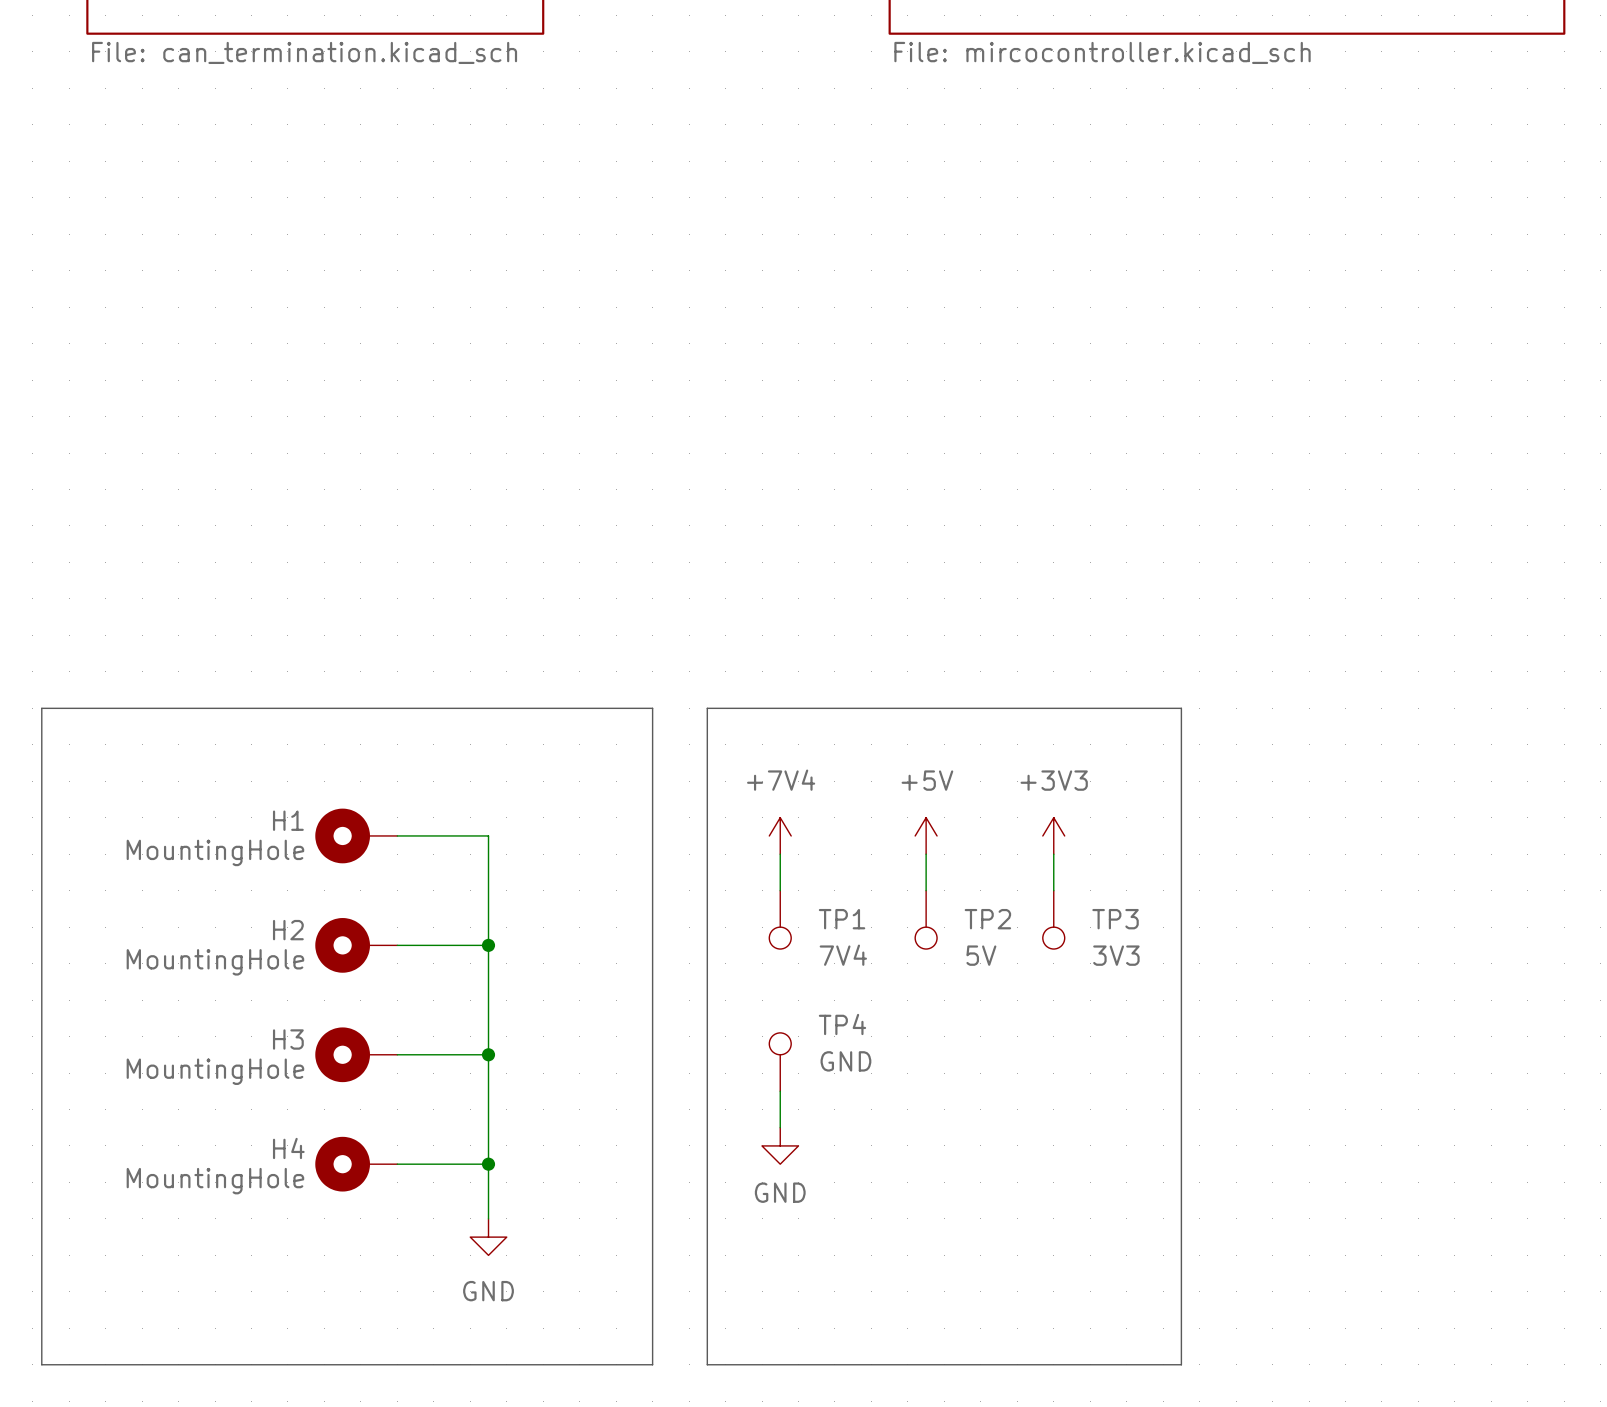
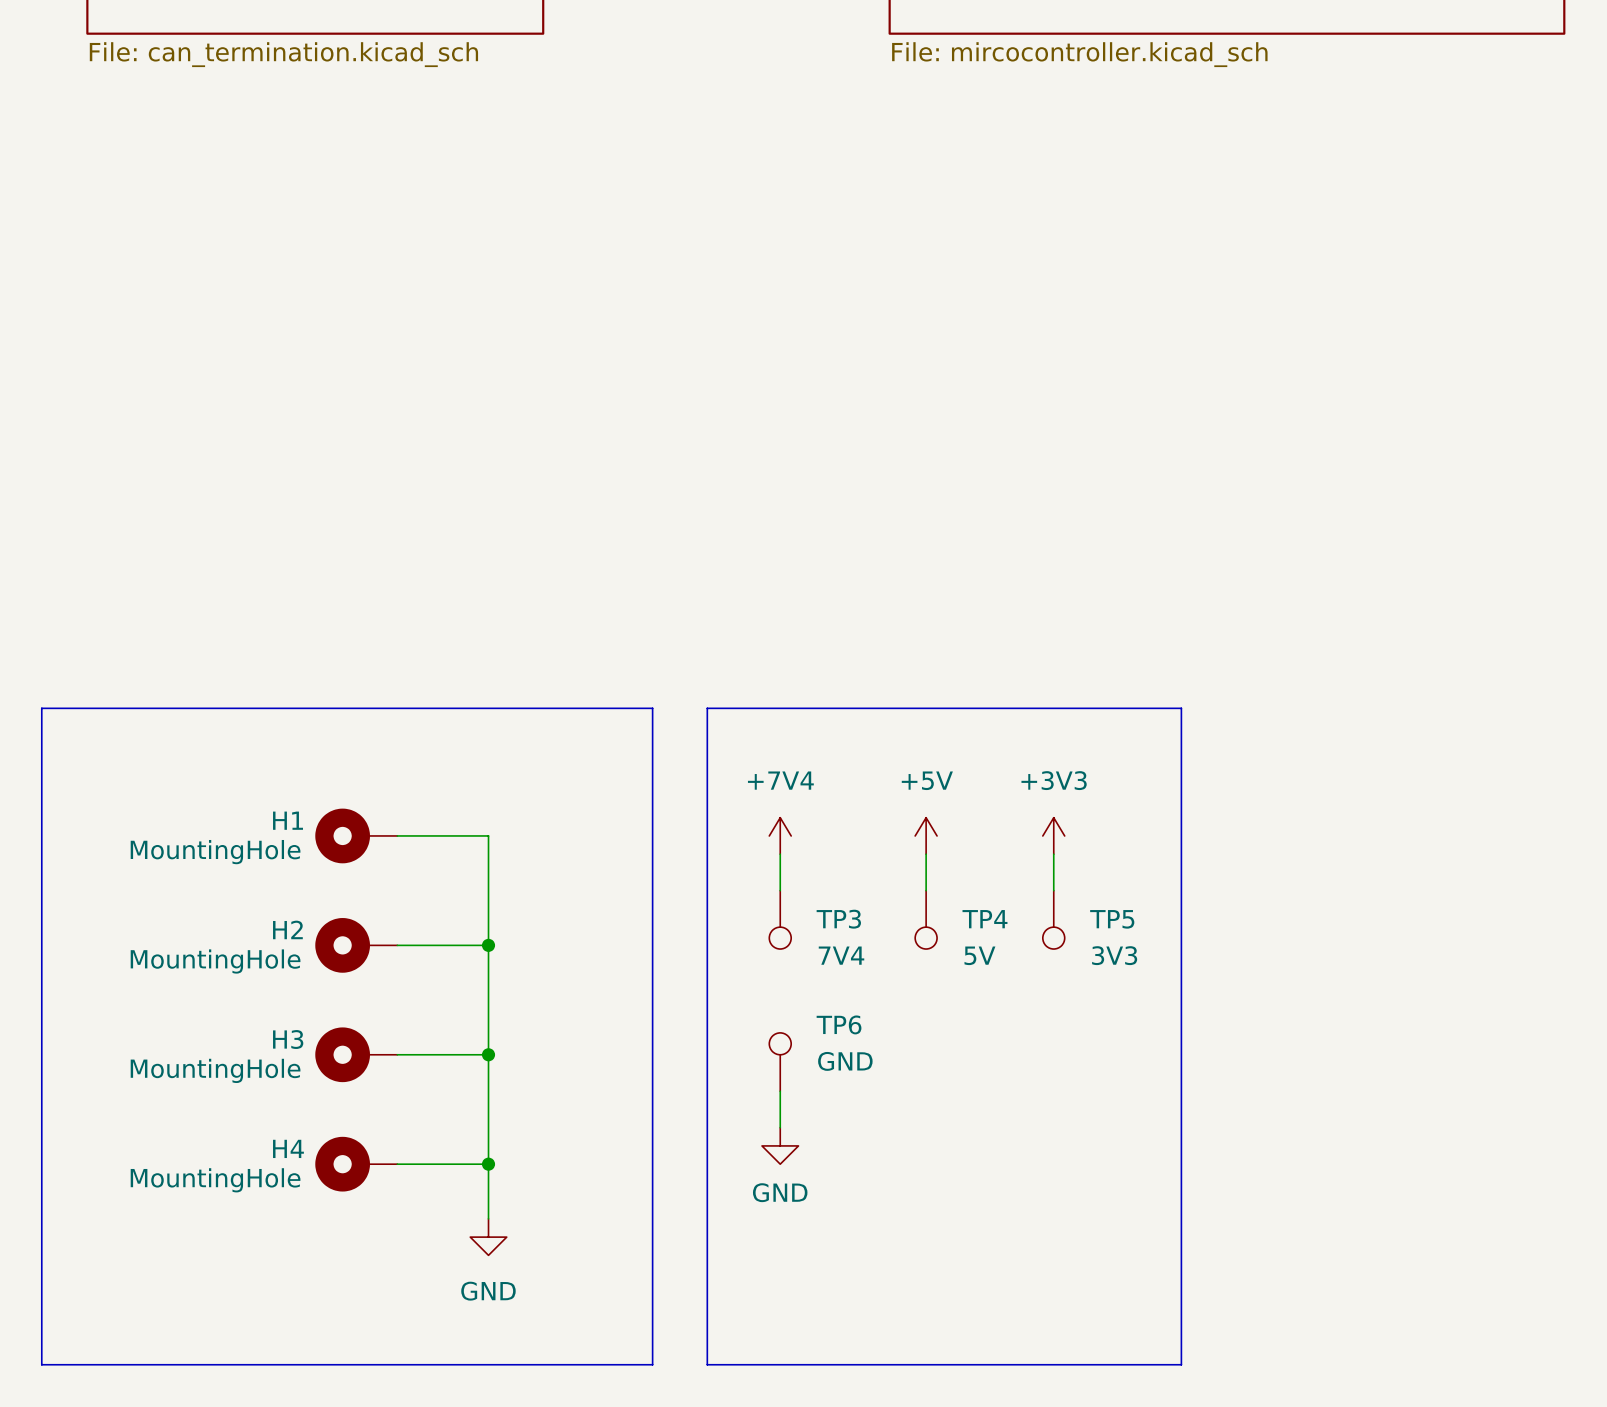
TP1 name: TP1 (842, 919) -> TP3 (838, 919)
TP2 name: TP2 (987, 919) -> TP4 (984, 919)
TP3 name: TP3 (1115, 919) -> TP5 (1112, 919)
TP4 name: TP4 (842, 1024) -> TP6 (839, 1024)

